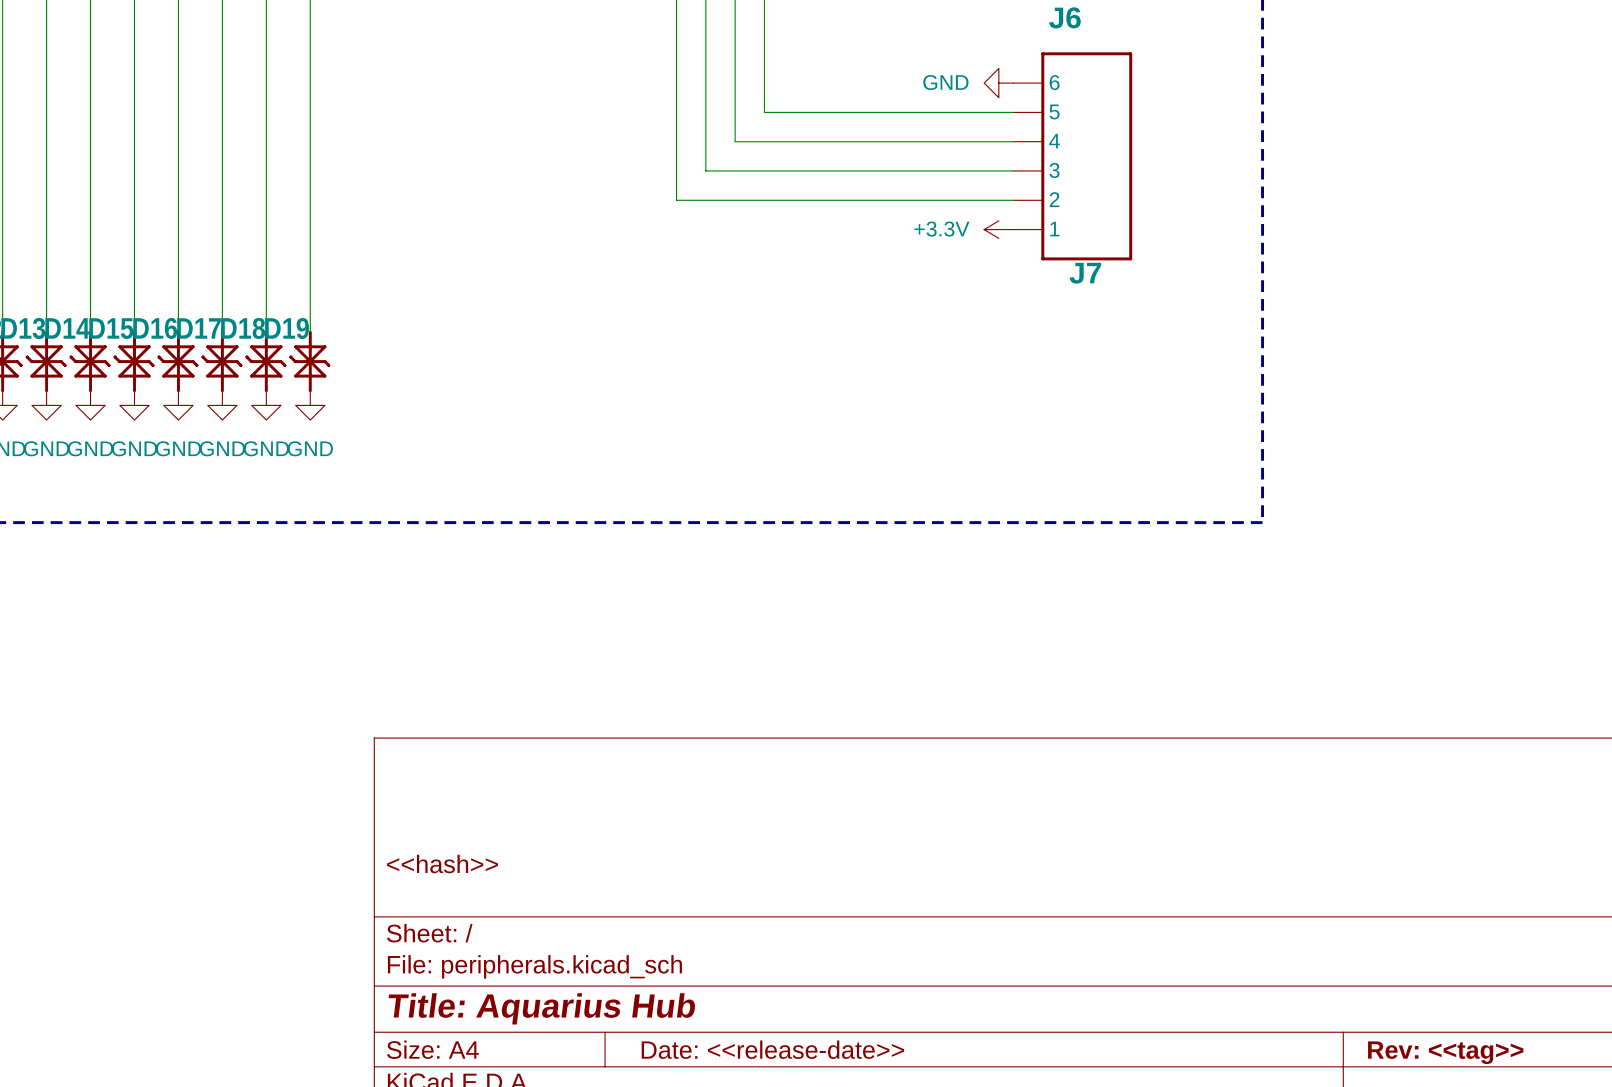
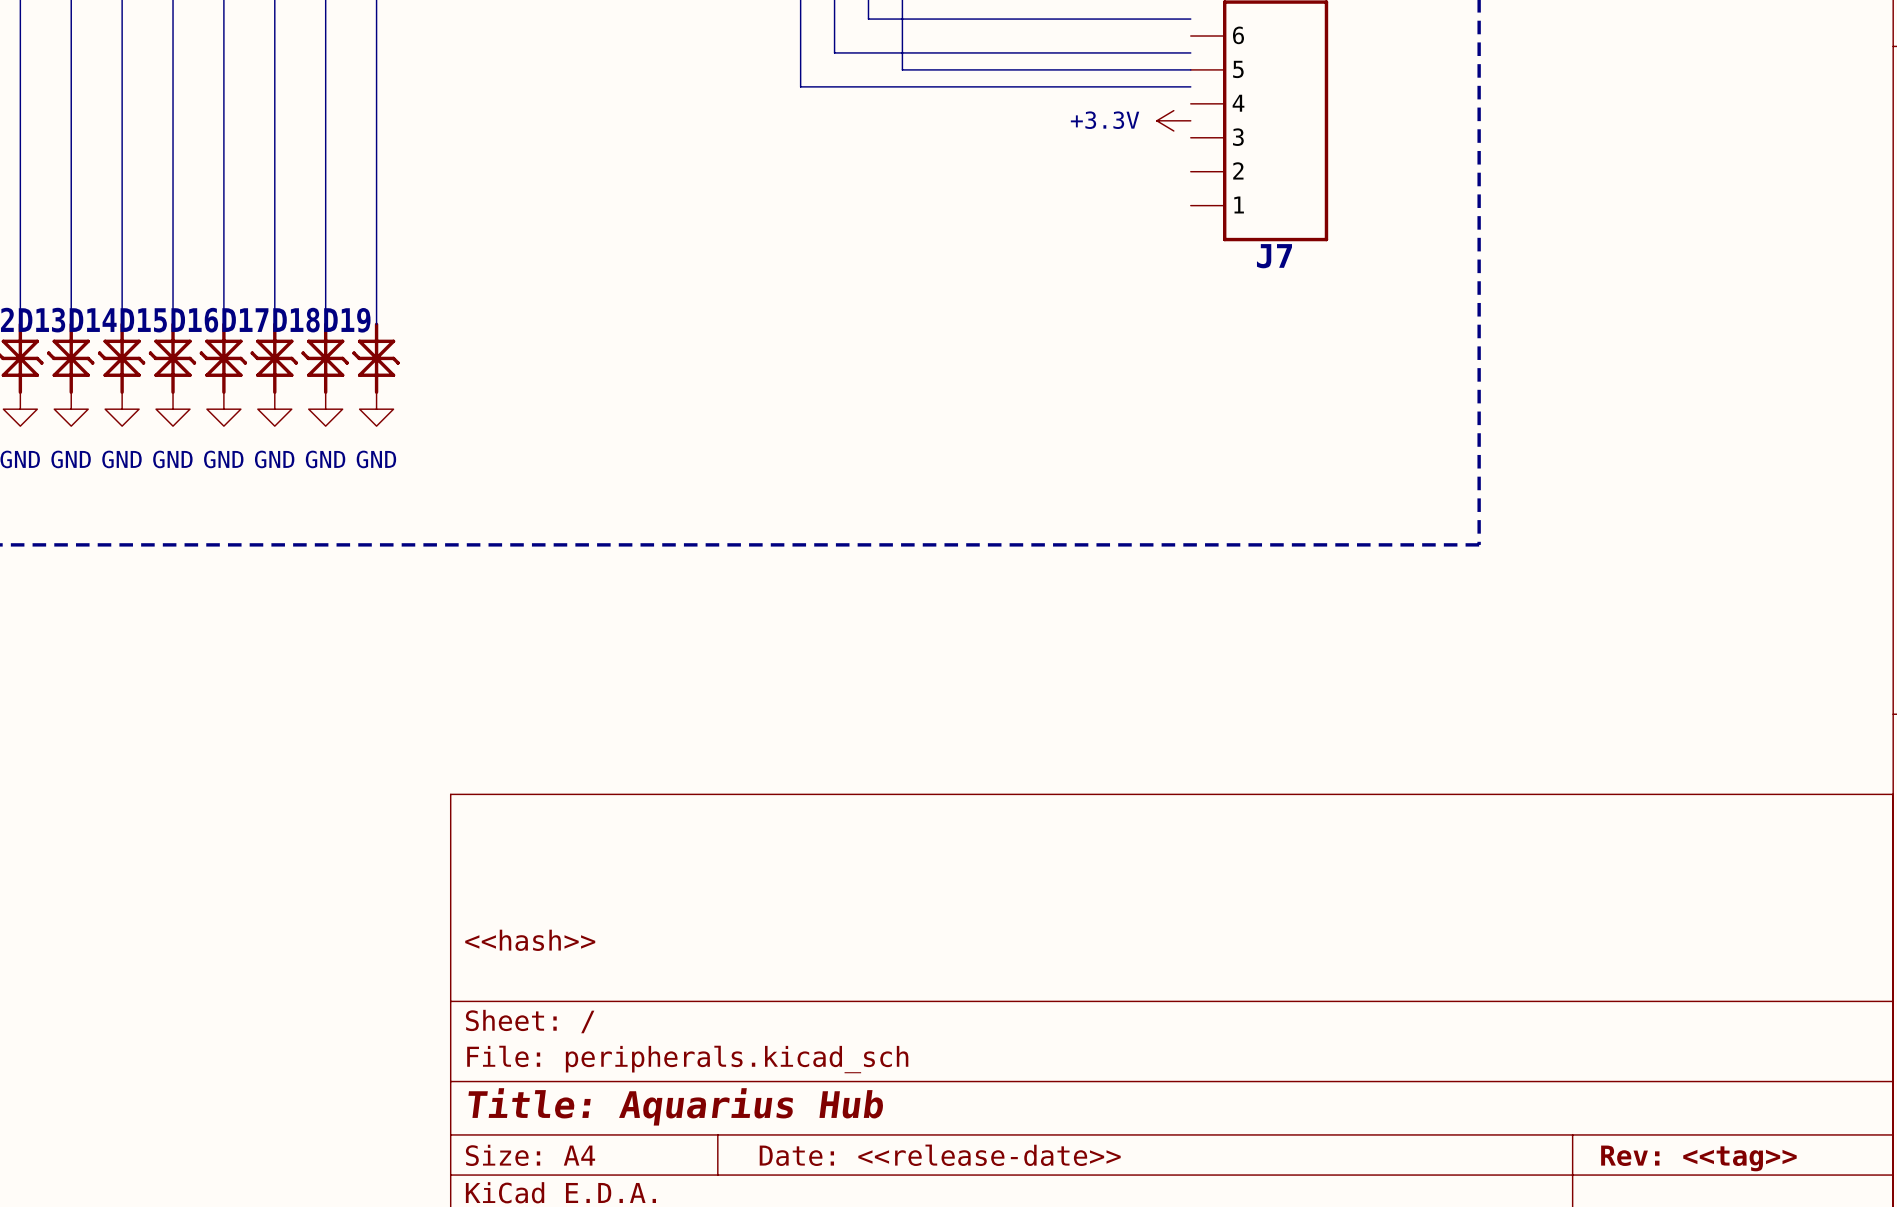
wire: (735, 68) (735, 141) (1013, 141) -> (868, 19) (1190, 19)
power symbol: GND (998, 83) -> none
wire: (705, 97) (705, 171) (1013, 171) -> (834, 52) (1190, 52)
wire: (676, 127) (676, 200) (1013, 200) -> (800, 86) (1190, 86)
power symbol position: +3.3V (998, 229) -> +3.3V (1173, 120)

